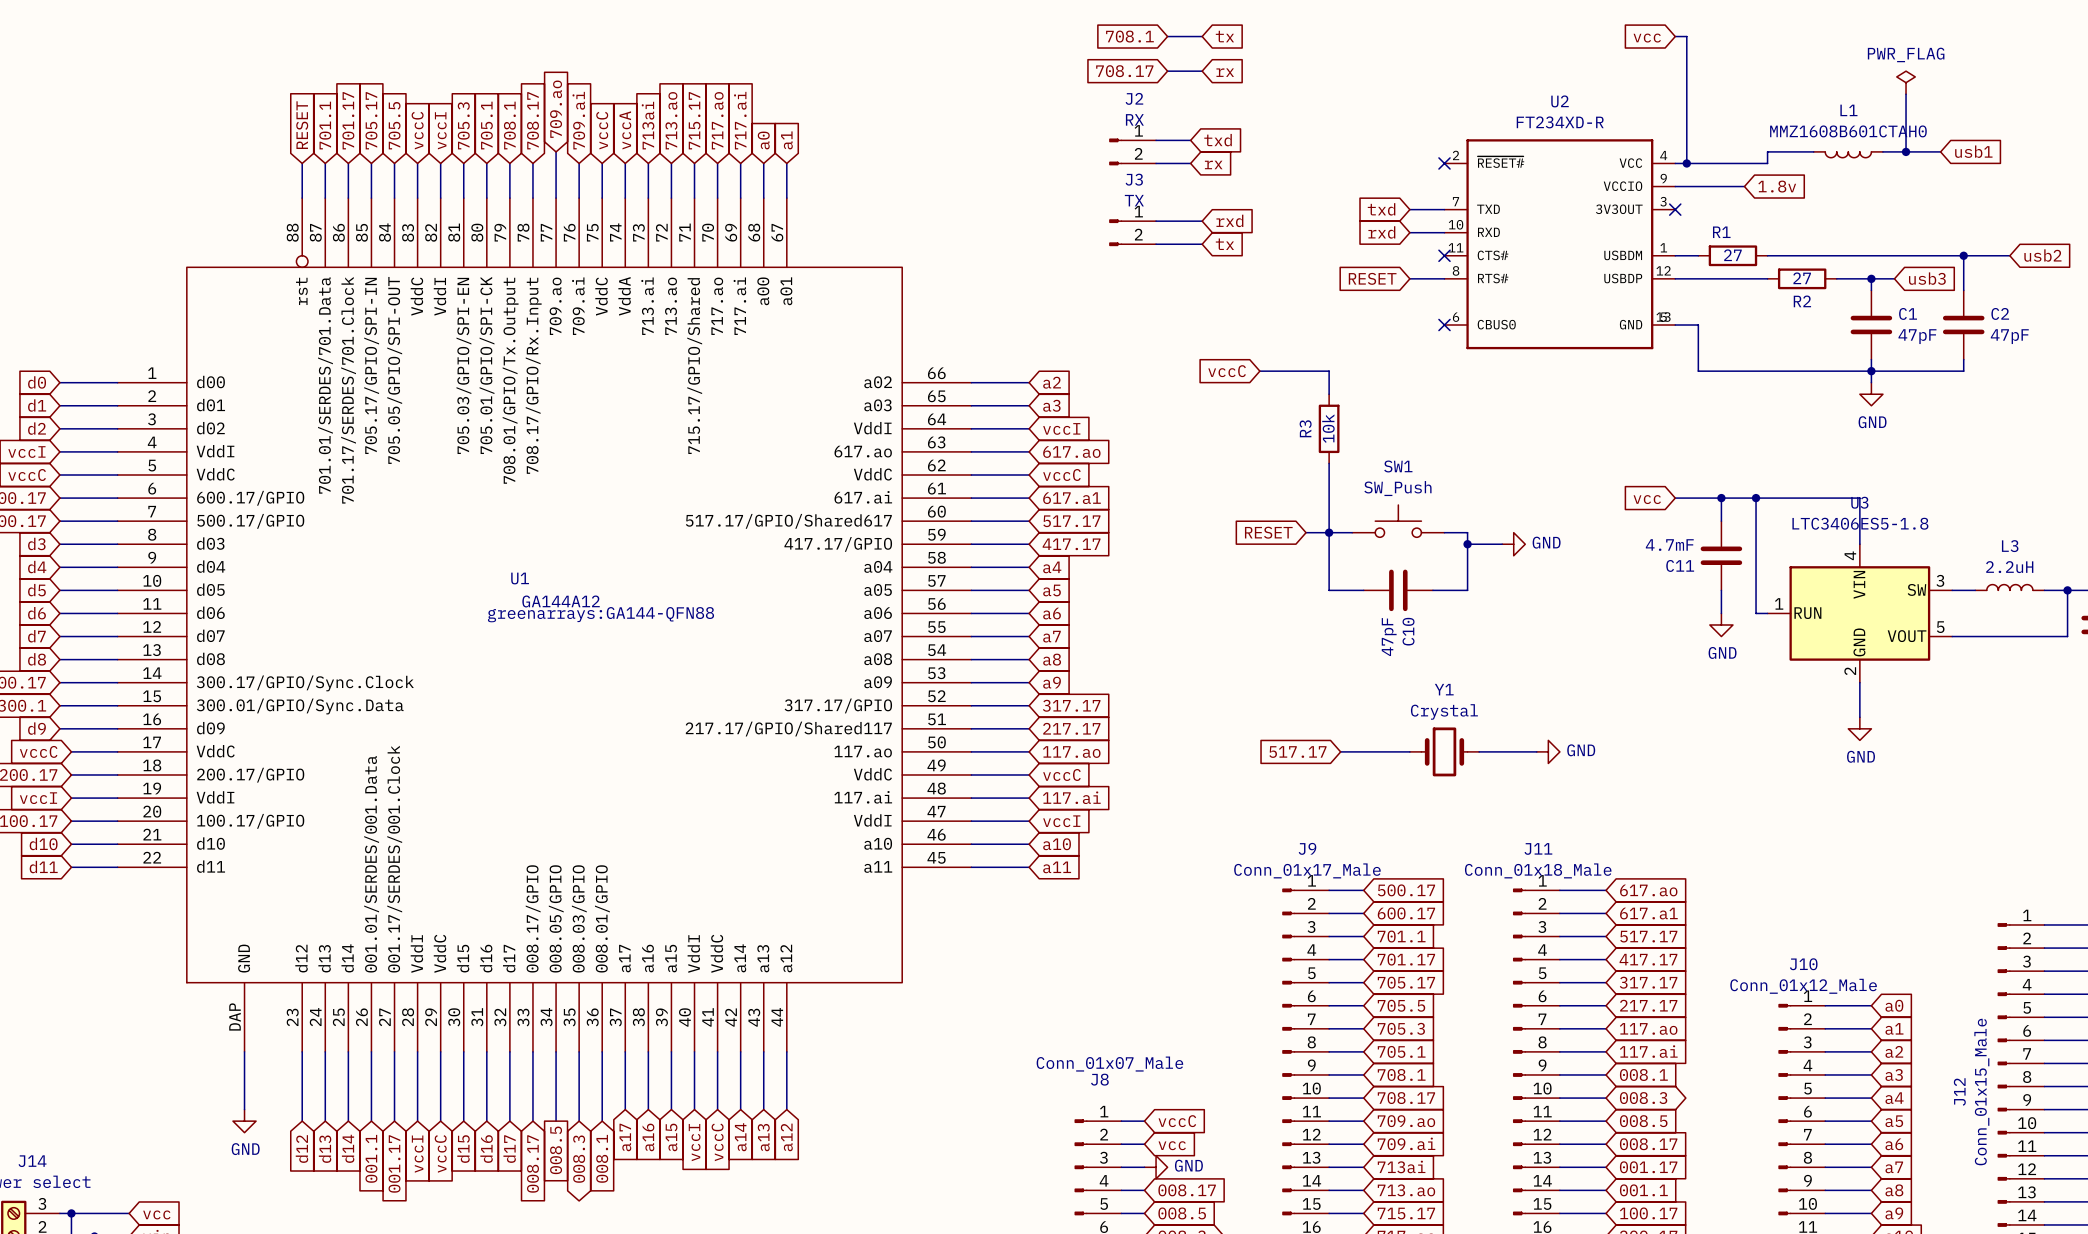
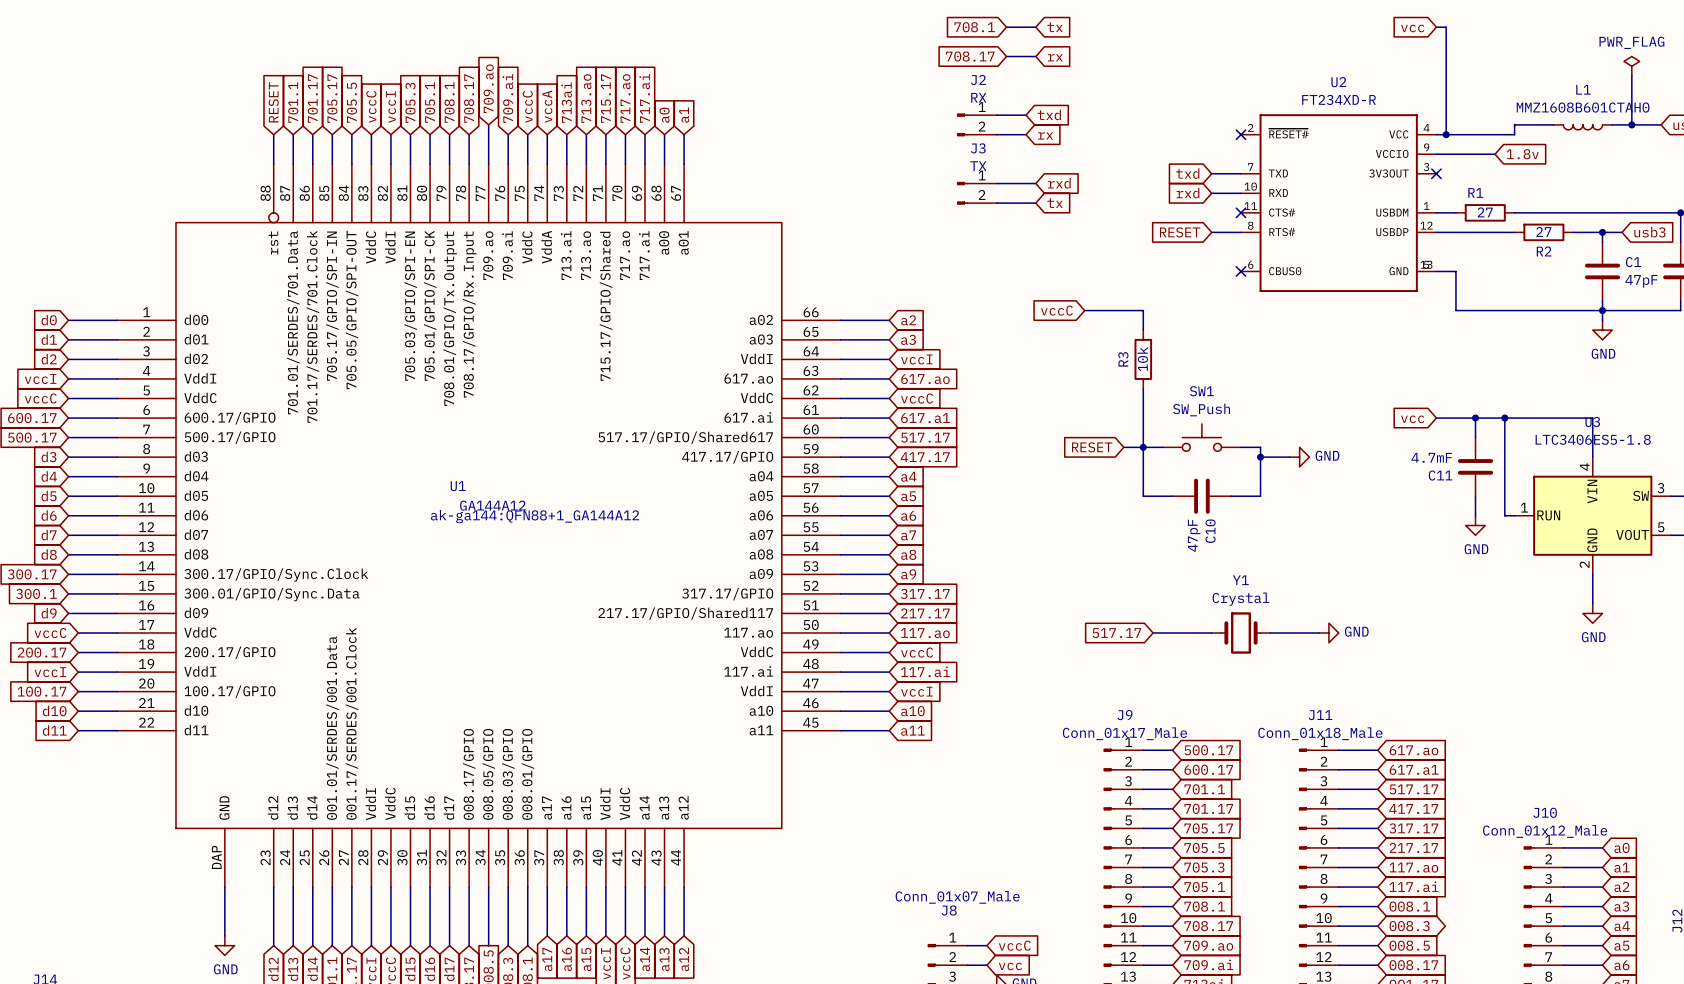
U1 text: greenarrays:GA144-QFN88 (600, 614) -> ak-ga144:QFN88+1_GA144A12 (535, 516)

